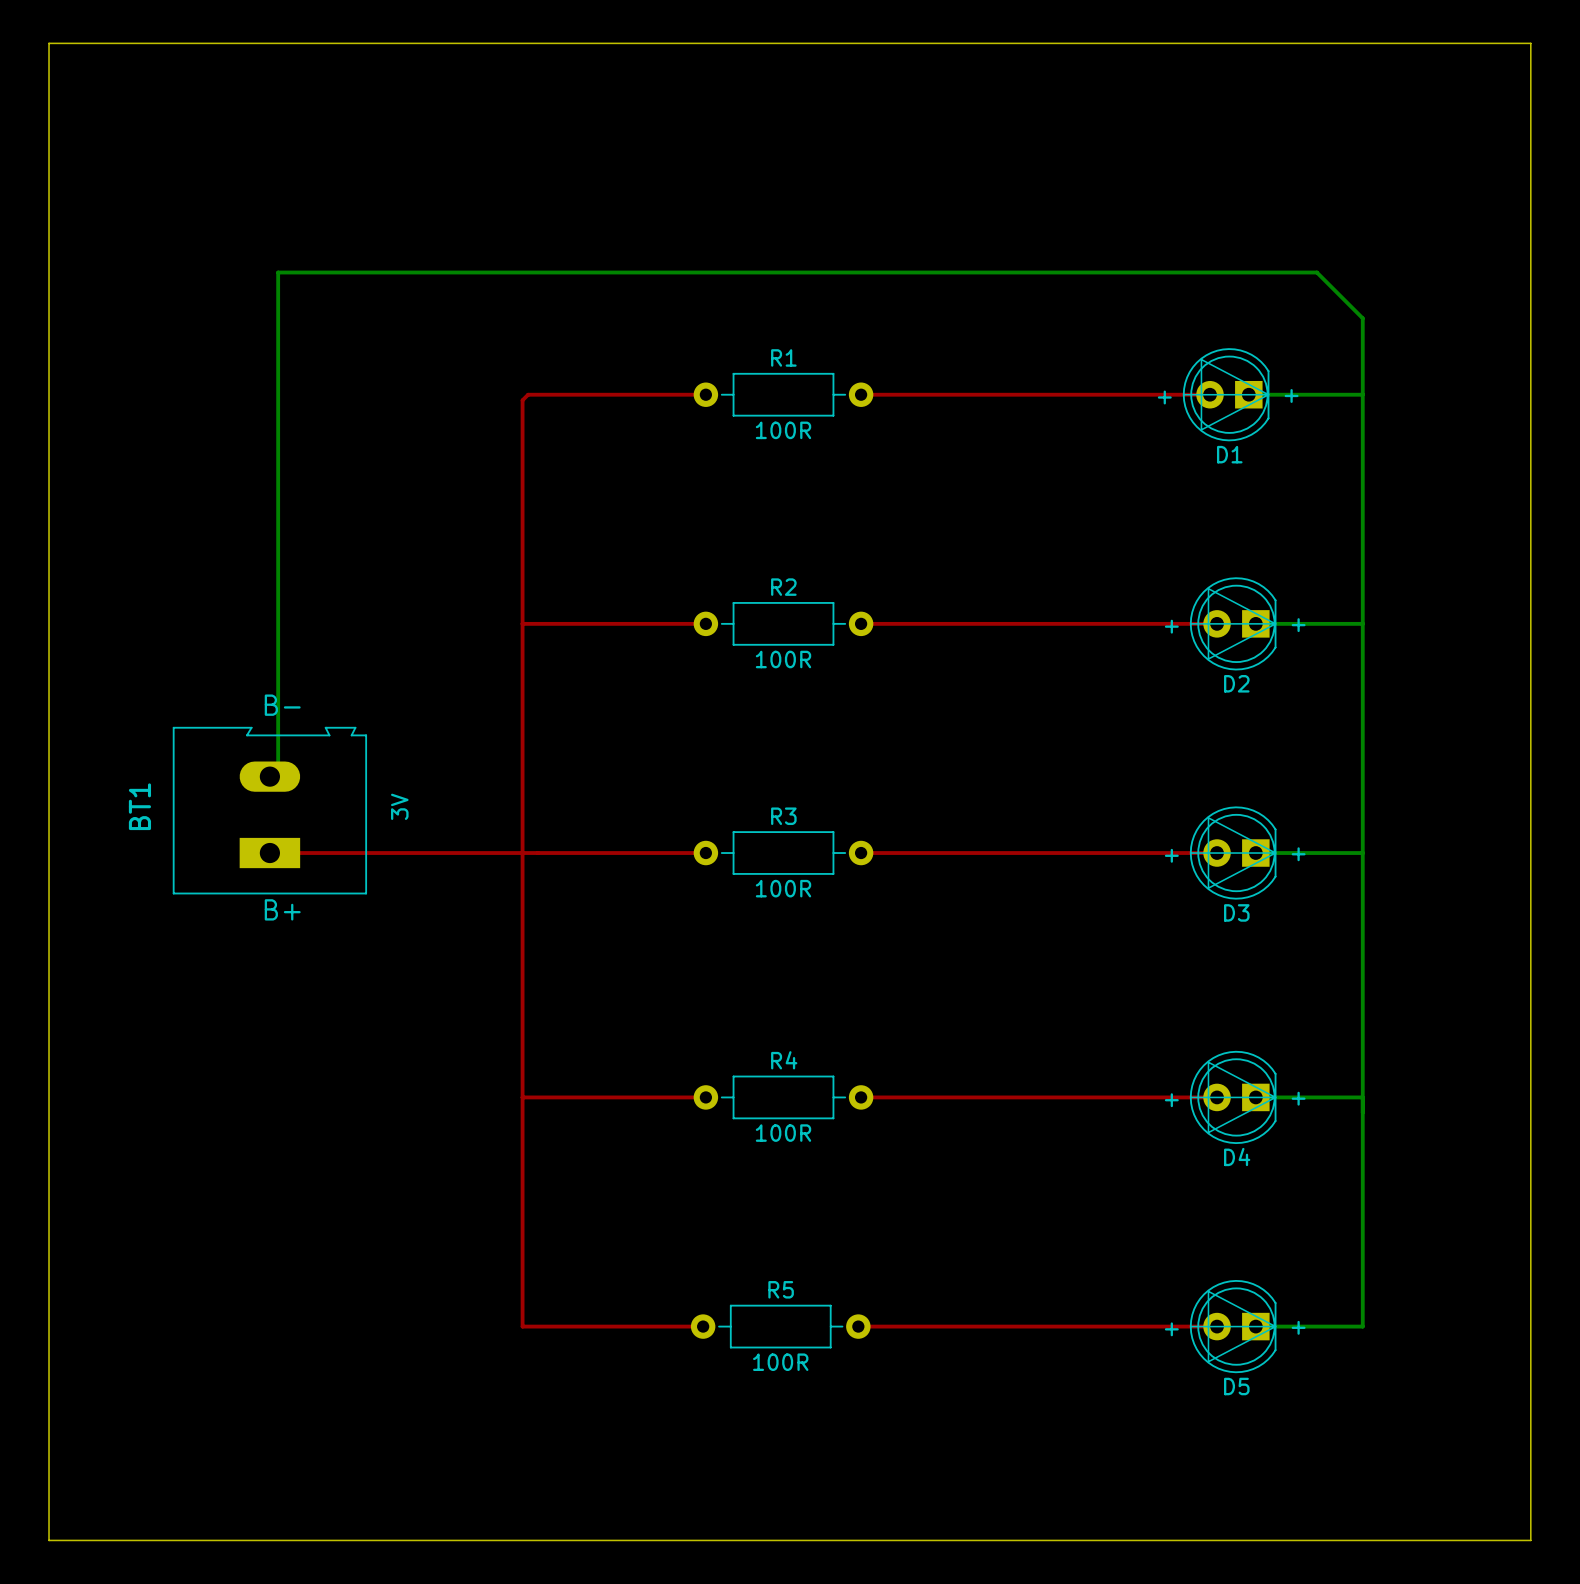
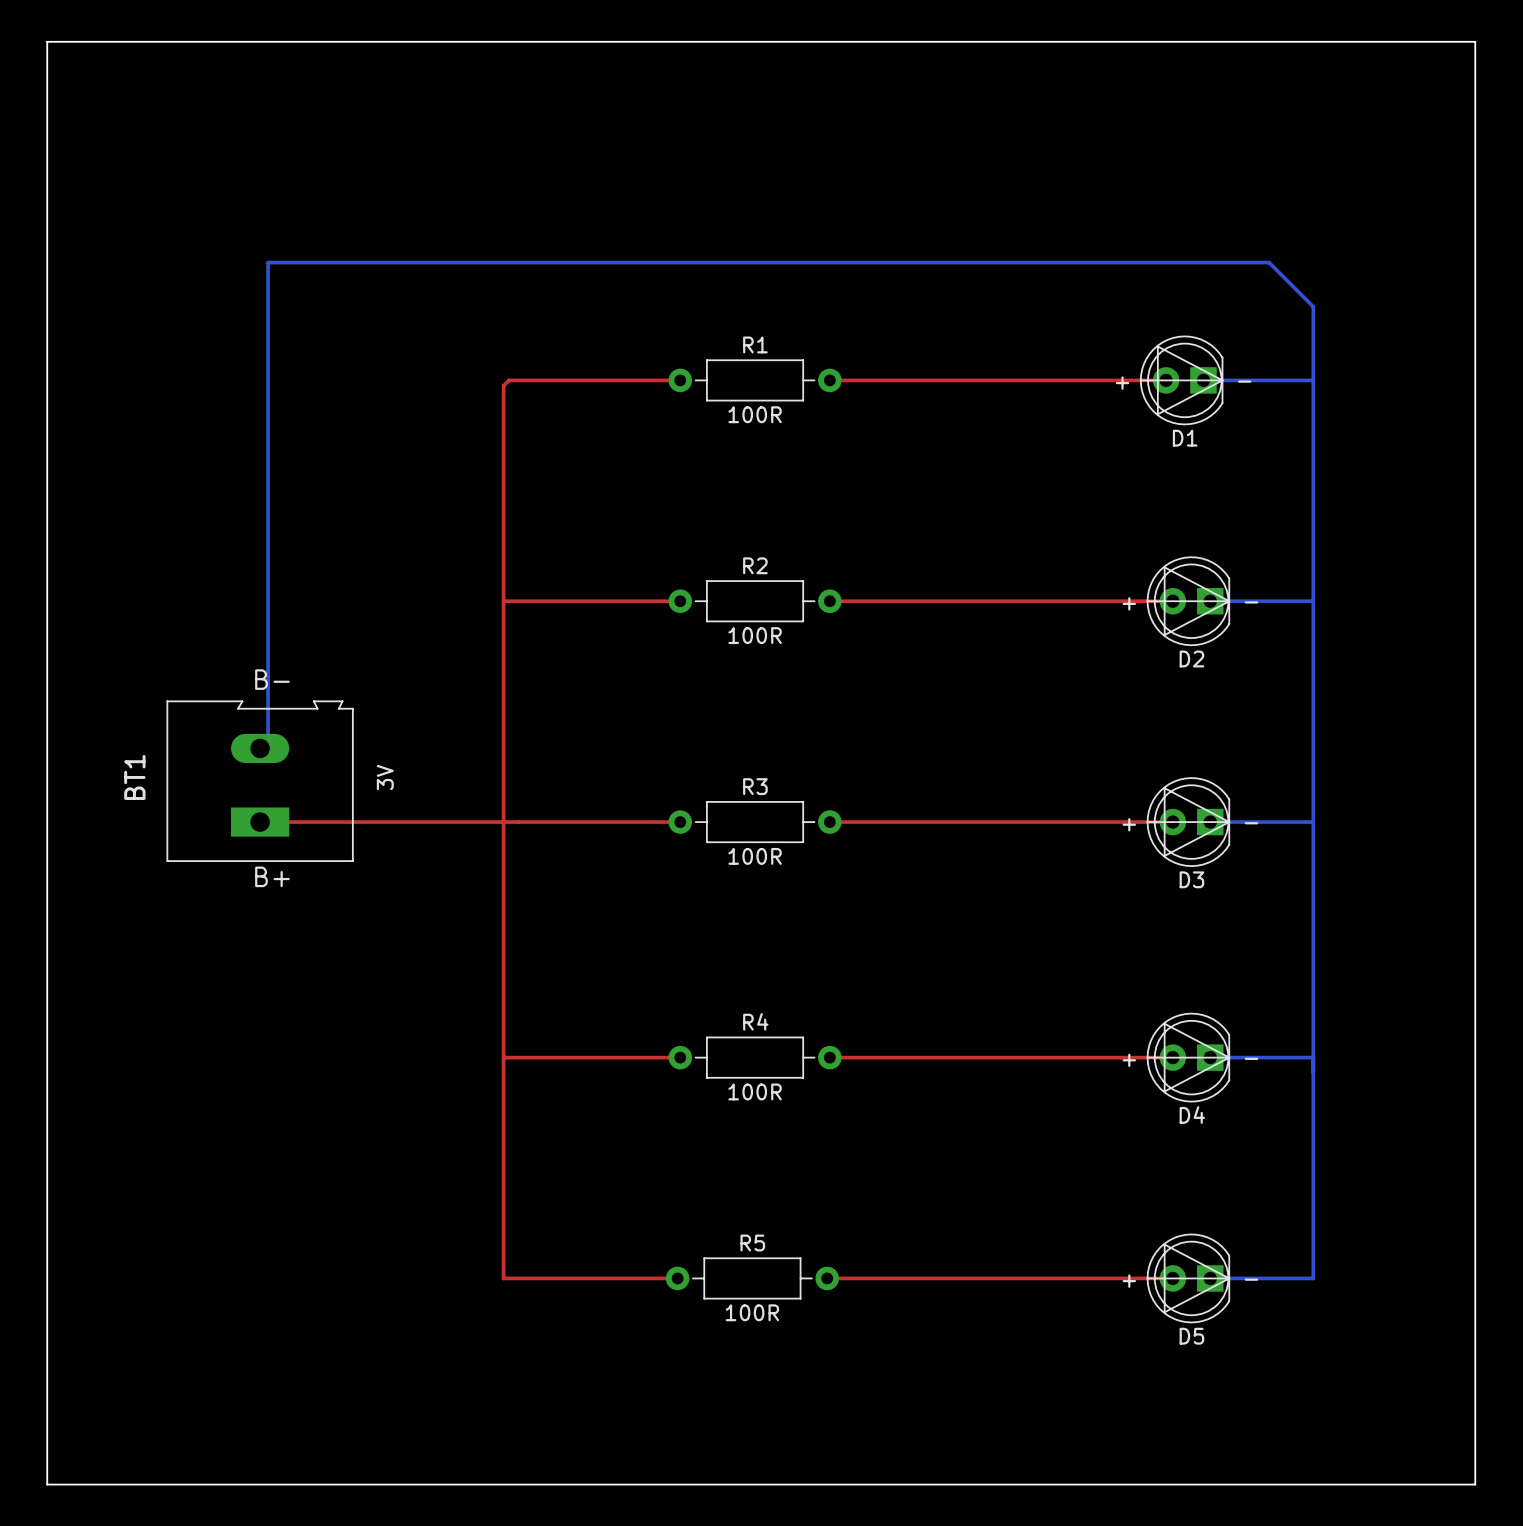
D1 text: + (1291, 395) -> - (1244, 381)
D2 text: + (1298, 625) -> - (1251, 602)
D3 text: + (1298, 854) -> - (1251, 823)
D4 text: + (1298, 1098) -> - (1251, 1058)
D5 text: + (1298, 1327) -> - (1251, 1279)

